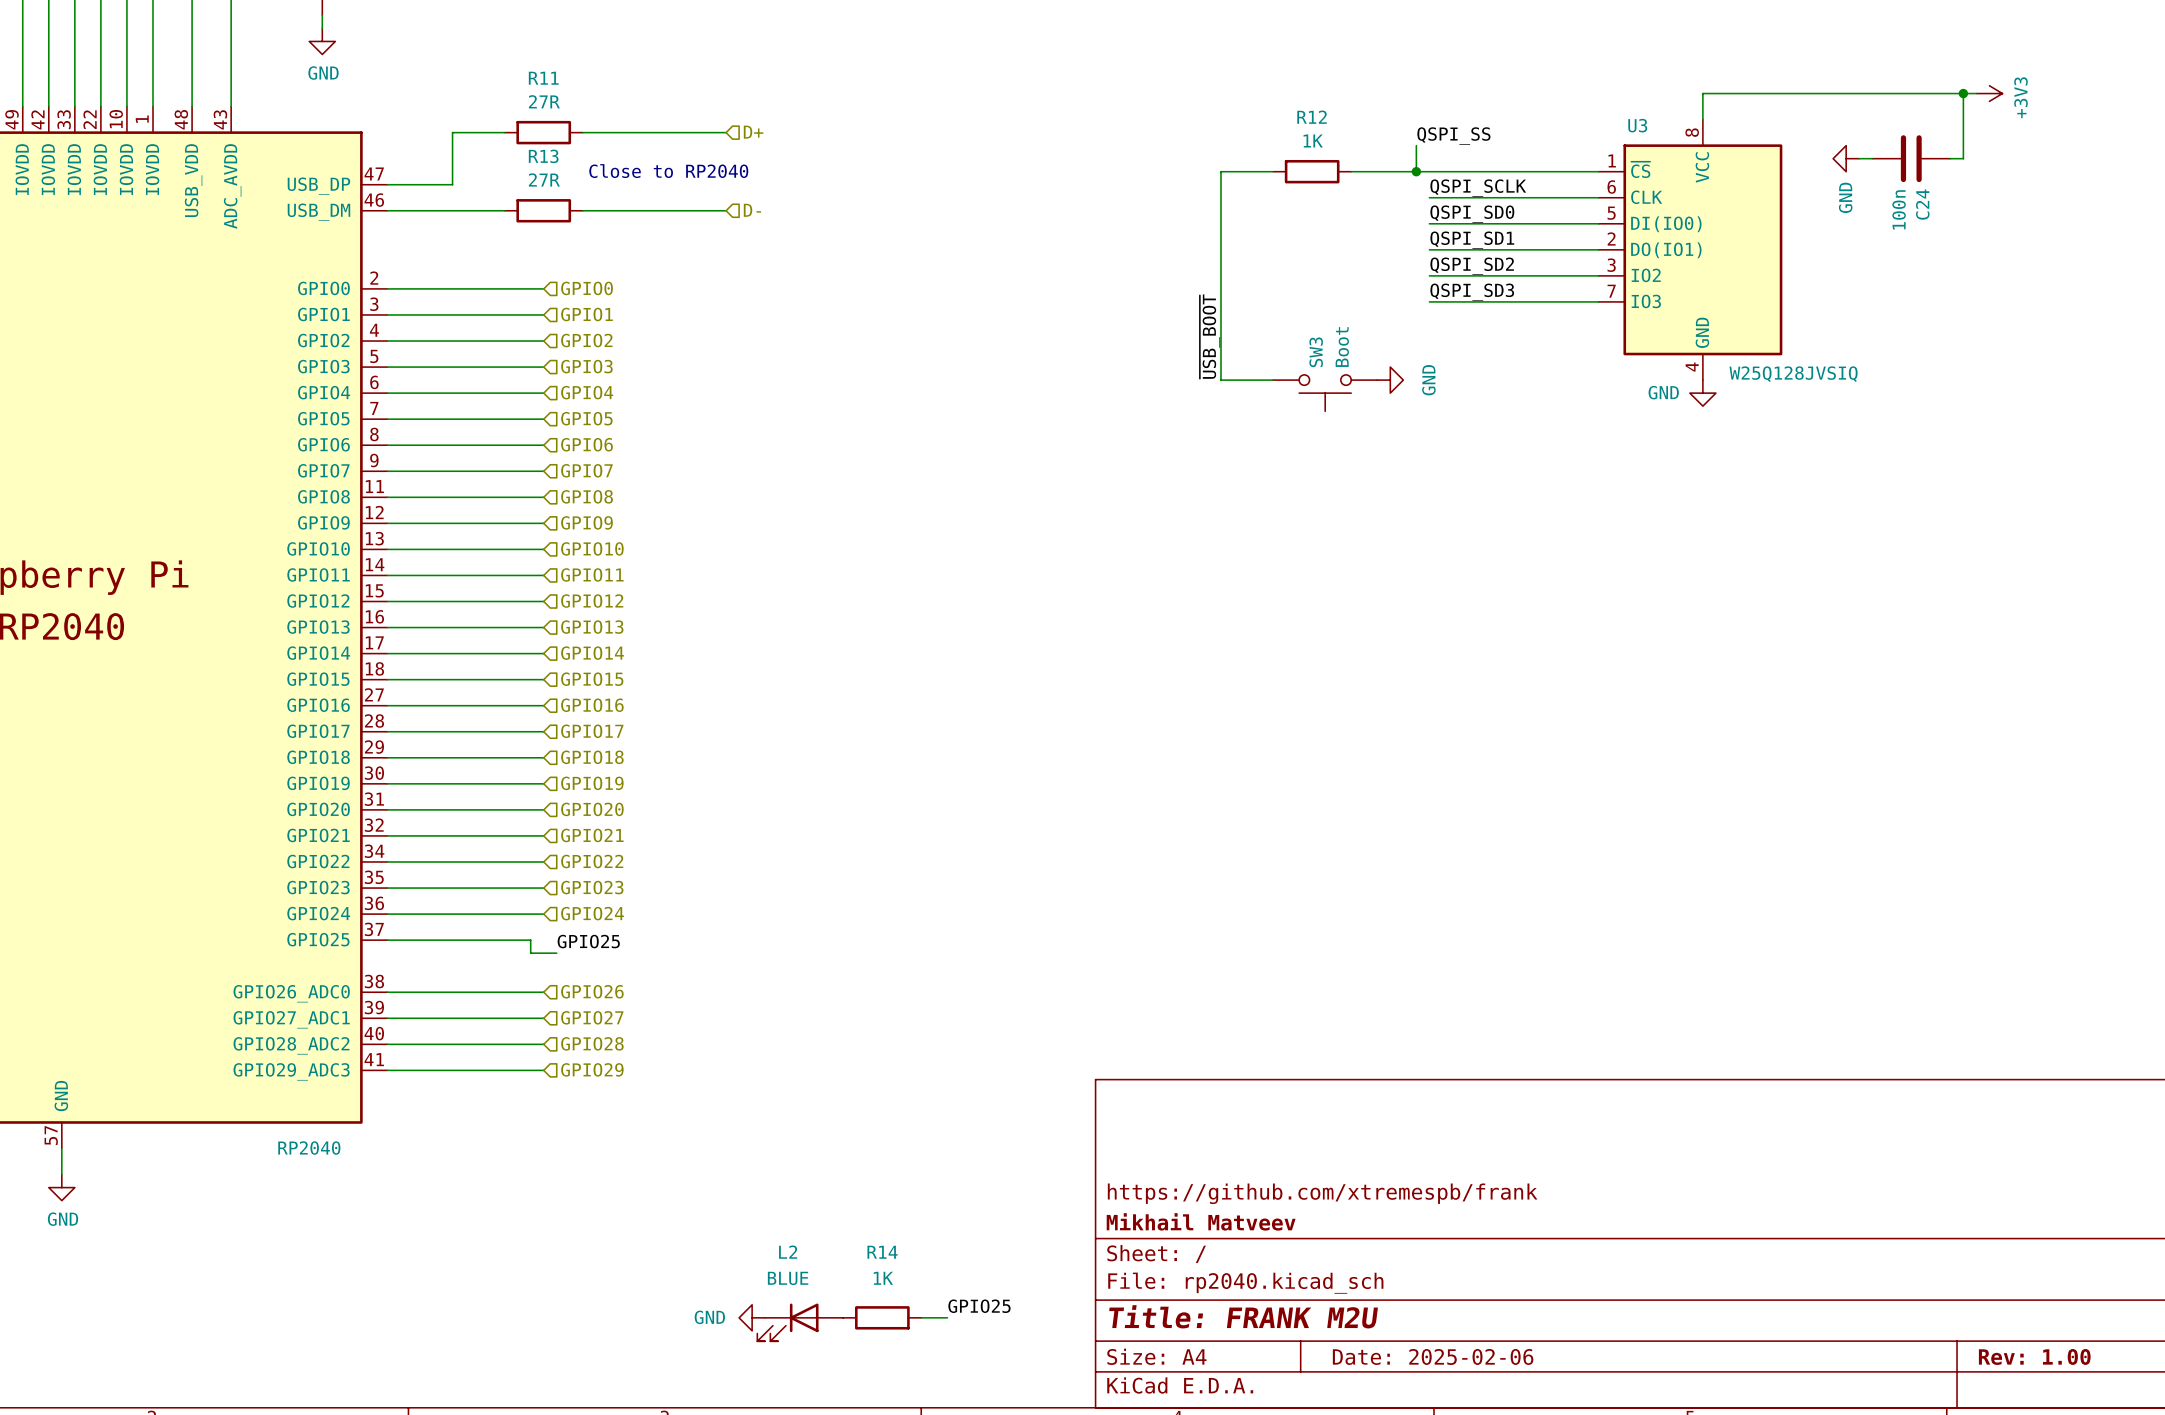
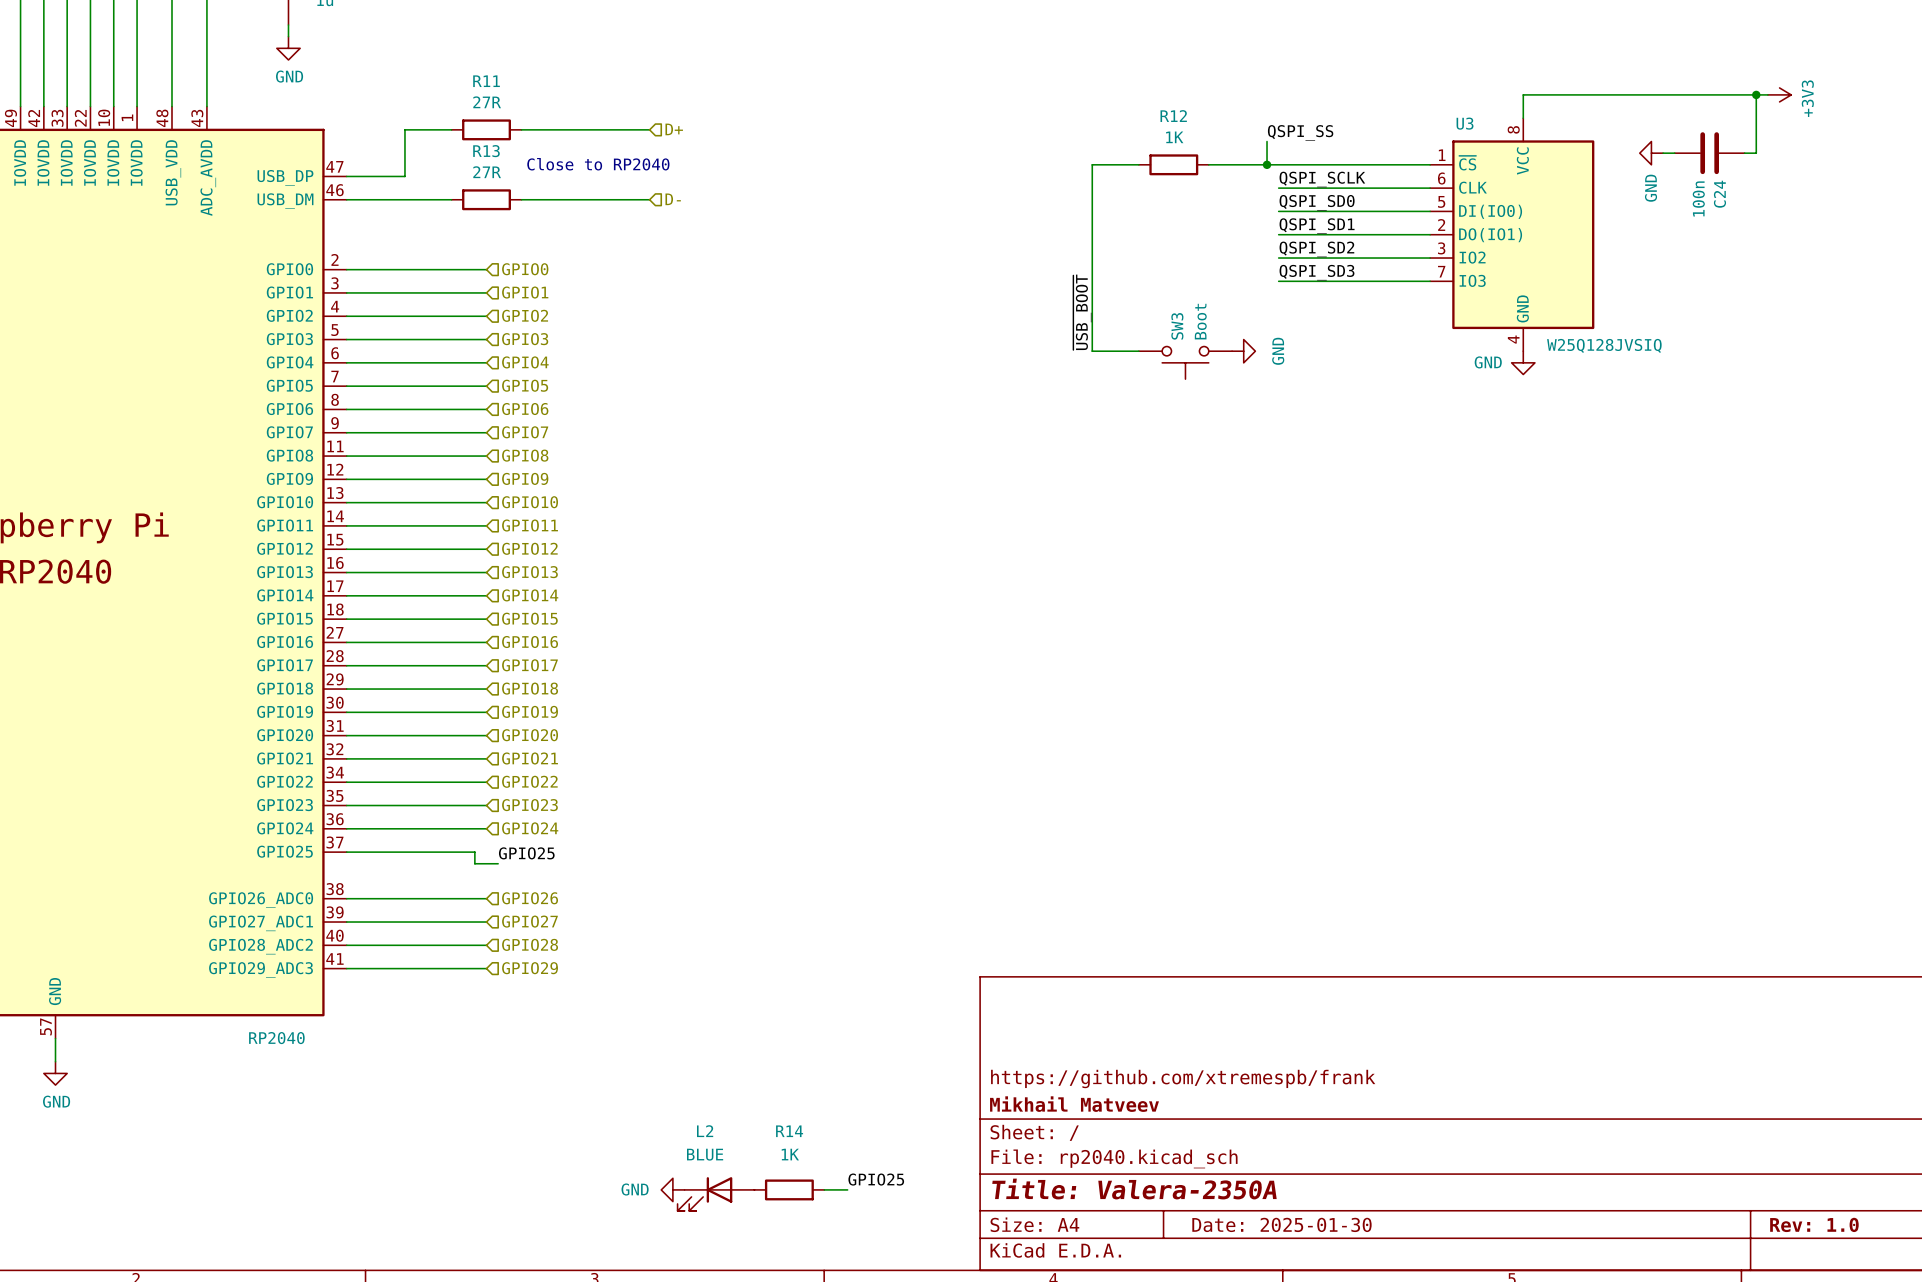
title block: Title: FRANK M2U (1243, 1316) -> Title: Valera-2350A (1134, 1189)
title block: Date: 2025-02-06 (1433, 1356) -> Date: 2025-01-30 (1281, 1224)
title block: Rev: 1.00 (2034, 1356) -> Rev: 1.0 (1814, 1224)

